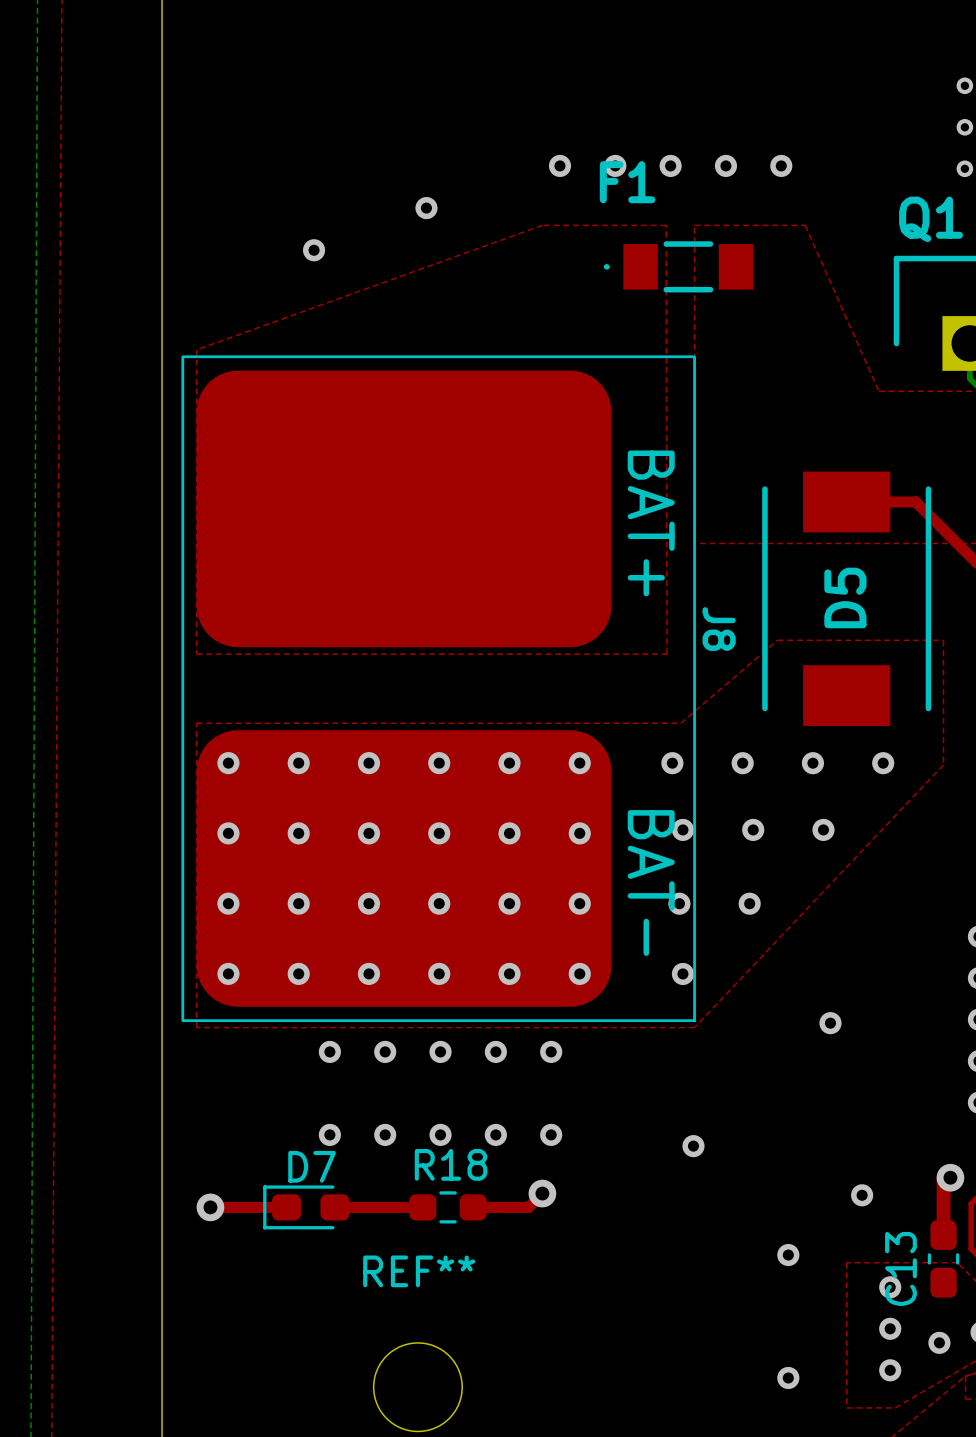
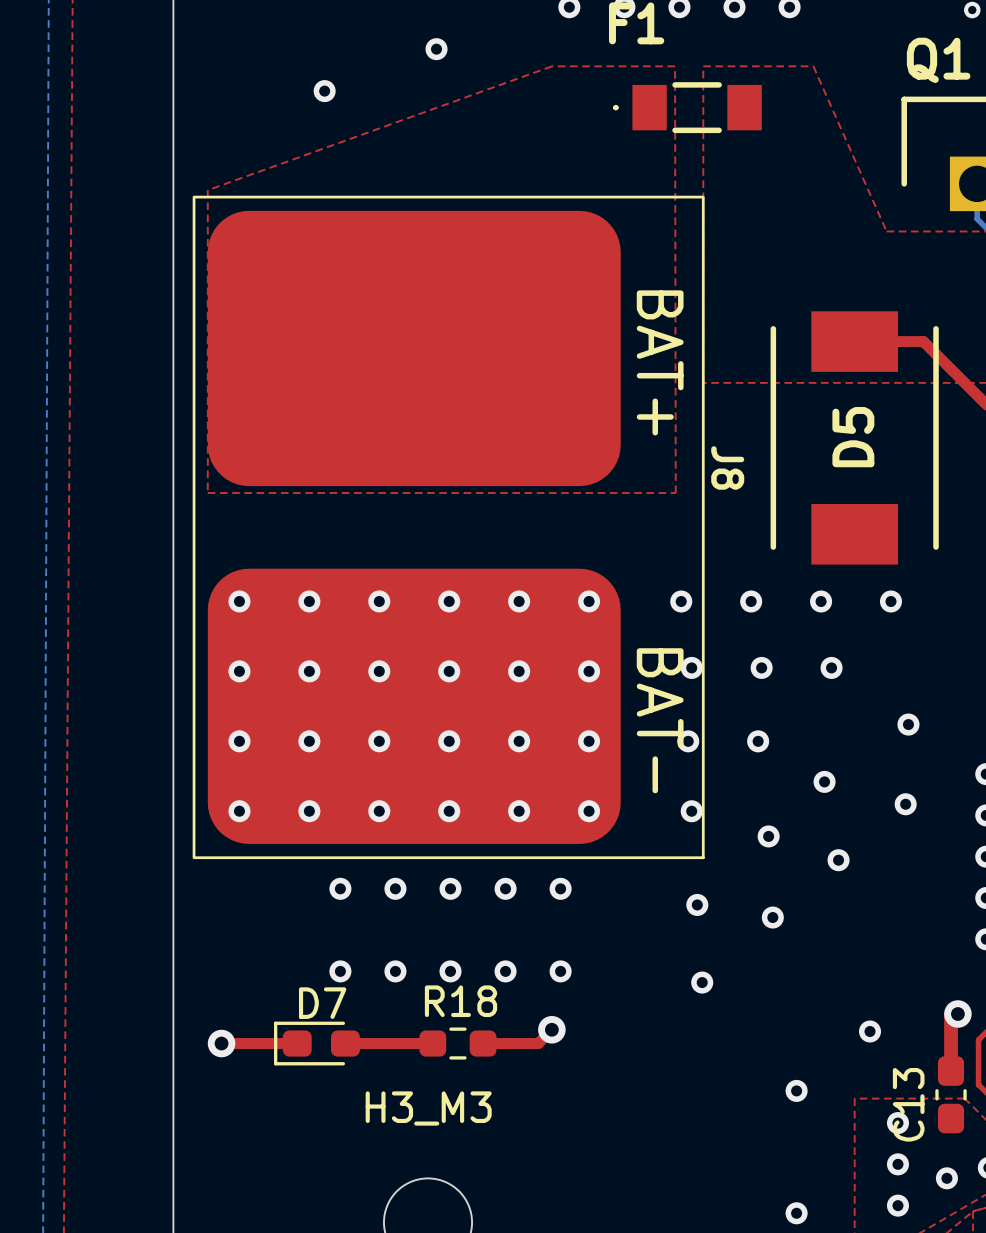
top zone outline: (777, 640) (680, 723) (196, 723) (196, 1027) (694, 1027) (943, 764) (943, 640) (777, 640) -> none
via: none -> (908, 724)
via: none -> (824, 781)
via: none -> (905, 804)
via: none -> (768, 836)
via: none -> (697, 904)
via: none -> (772, 917)
REF** name: REF** (419, 1271) -> H3_M3 (428, 1108)

